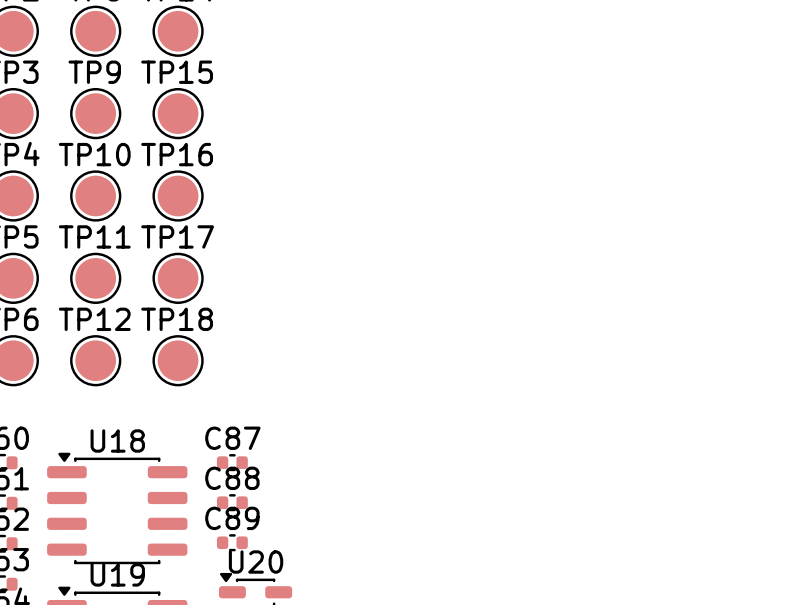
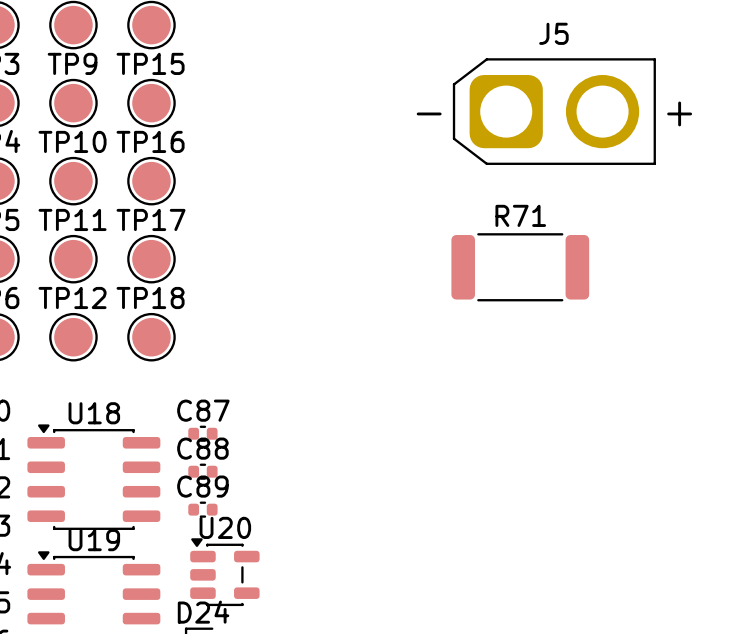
J5: none -> (554, 111)
R71: none -> (520, 267)

